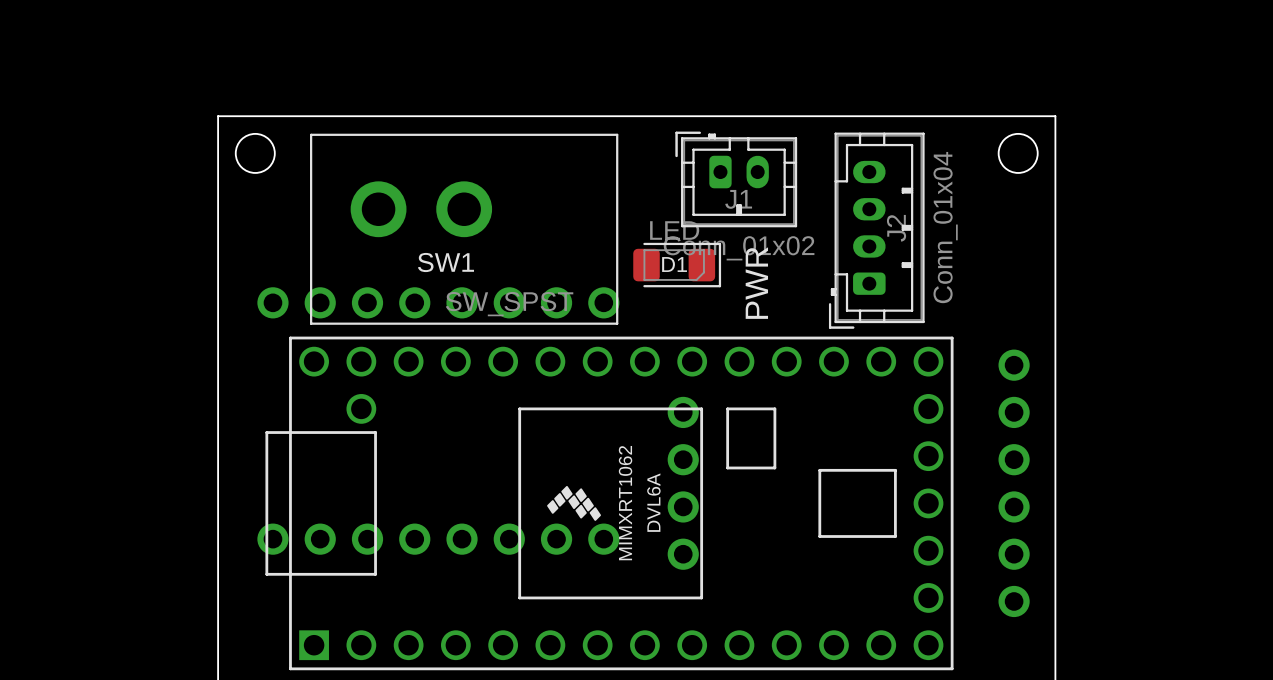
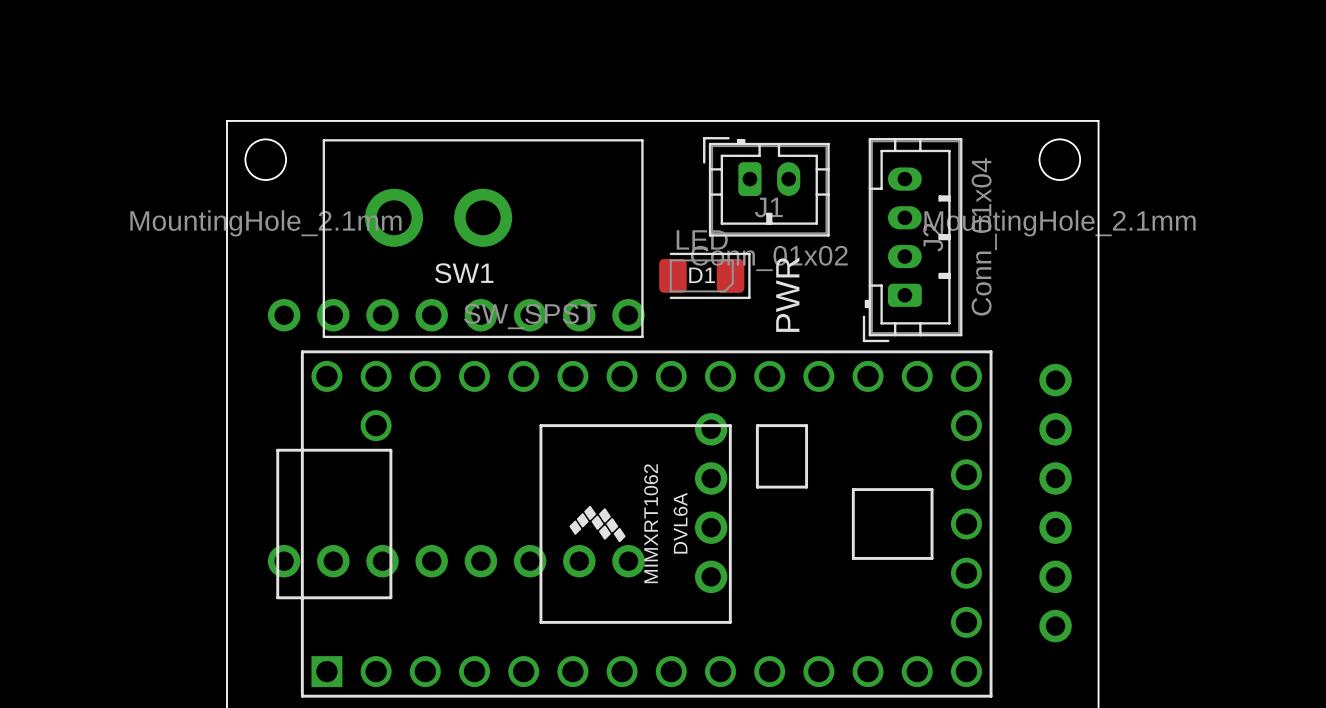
part value: none -> MountingHole_2.1mm (265, 223)
part value: none -> MountingHole_2.1mm (1060, 223)

